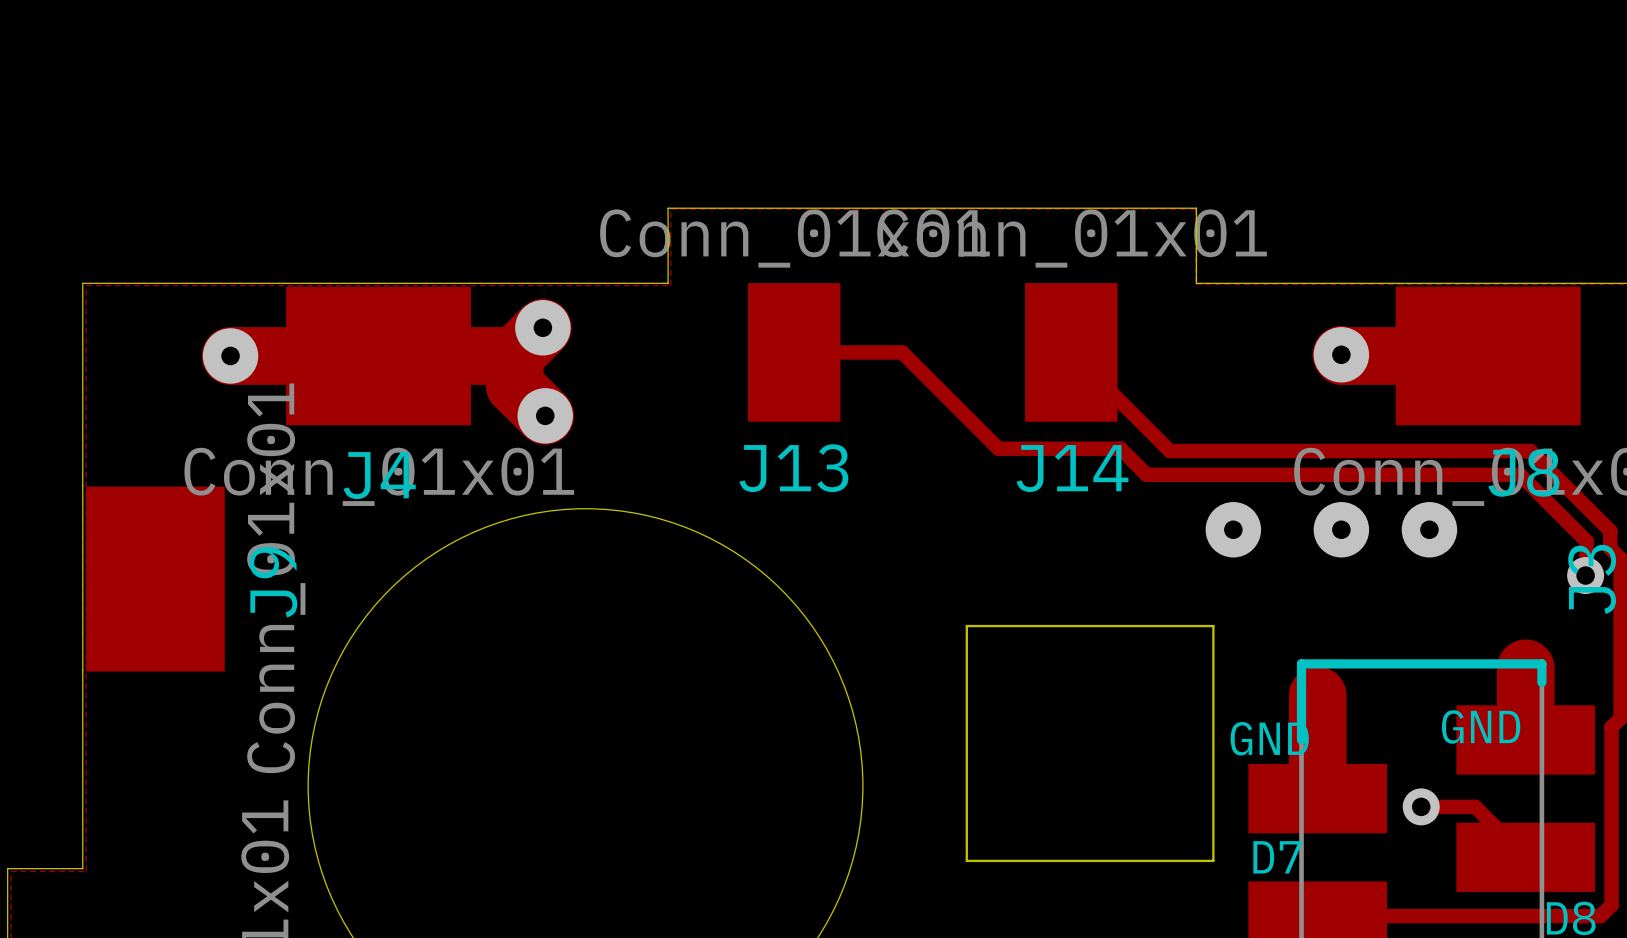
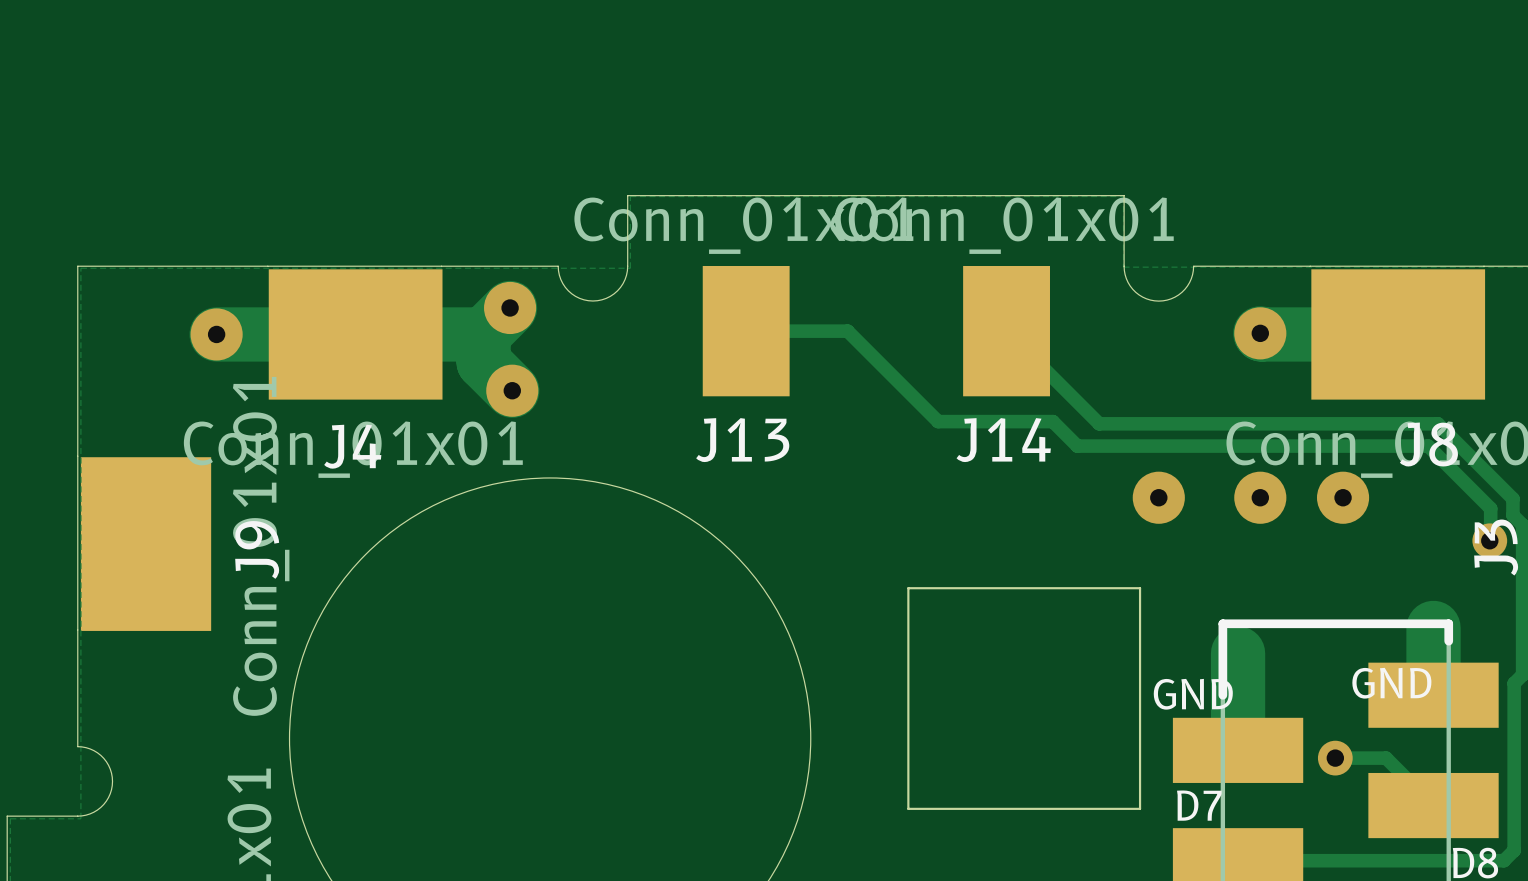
board edge: (594, 283) (668, 283) -> (558, 266) (560, 279) (568, 290) (579, 298) (592, 301) (606, 298) (617, 290) (625, 279) (627, 266)
board edge: (1196, 283) (1270, 283) -> (1124, 266) (1126, 278) (1132, 289) (1146, 298) (1158, 301) (1171, 298) (1181, 292) (1191, 278) (1193, 266)
board edge: (82, 794) (82, 868) -> (77, 746) (90, 748) (100, 755) (108, 765) (112, 781) (110, 793) (103, 804) (89, 813) (77, 816)

